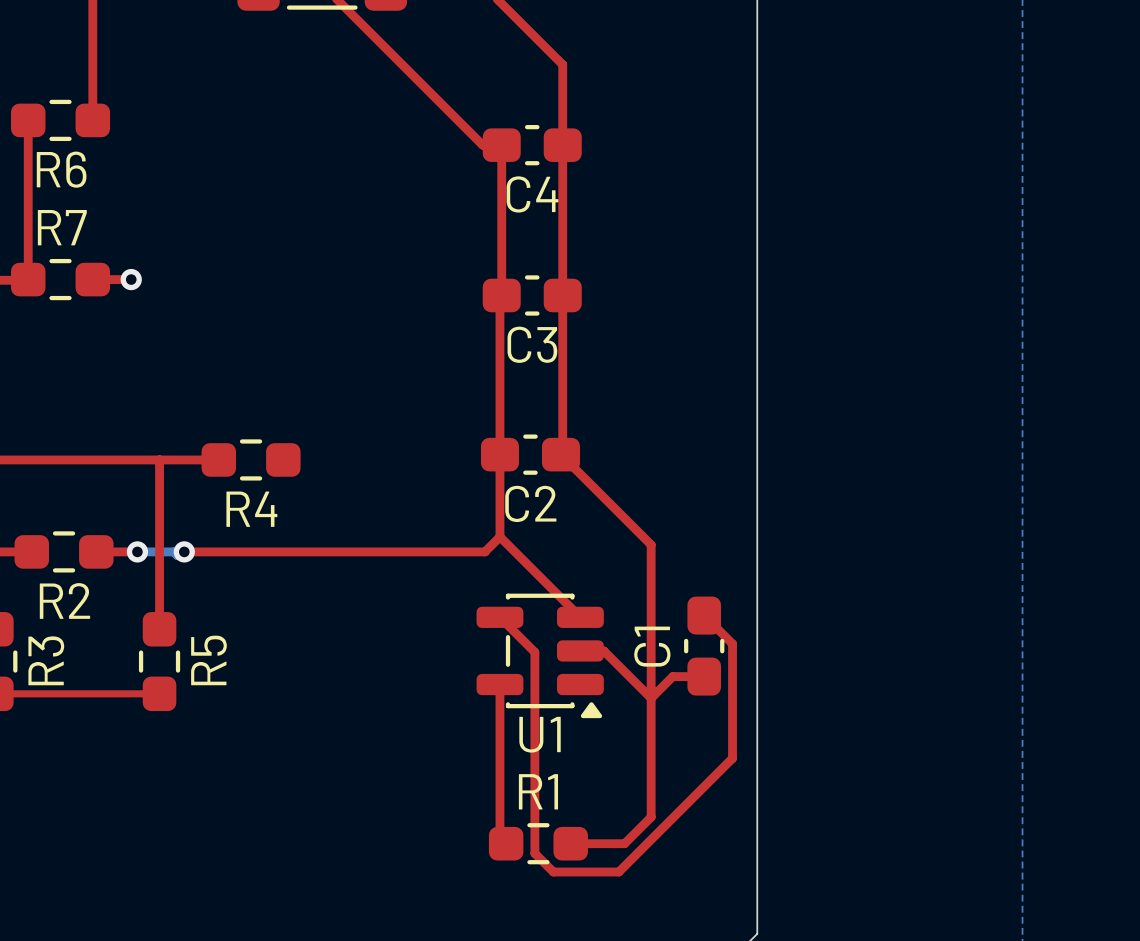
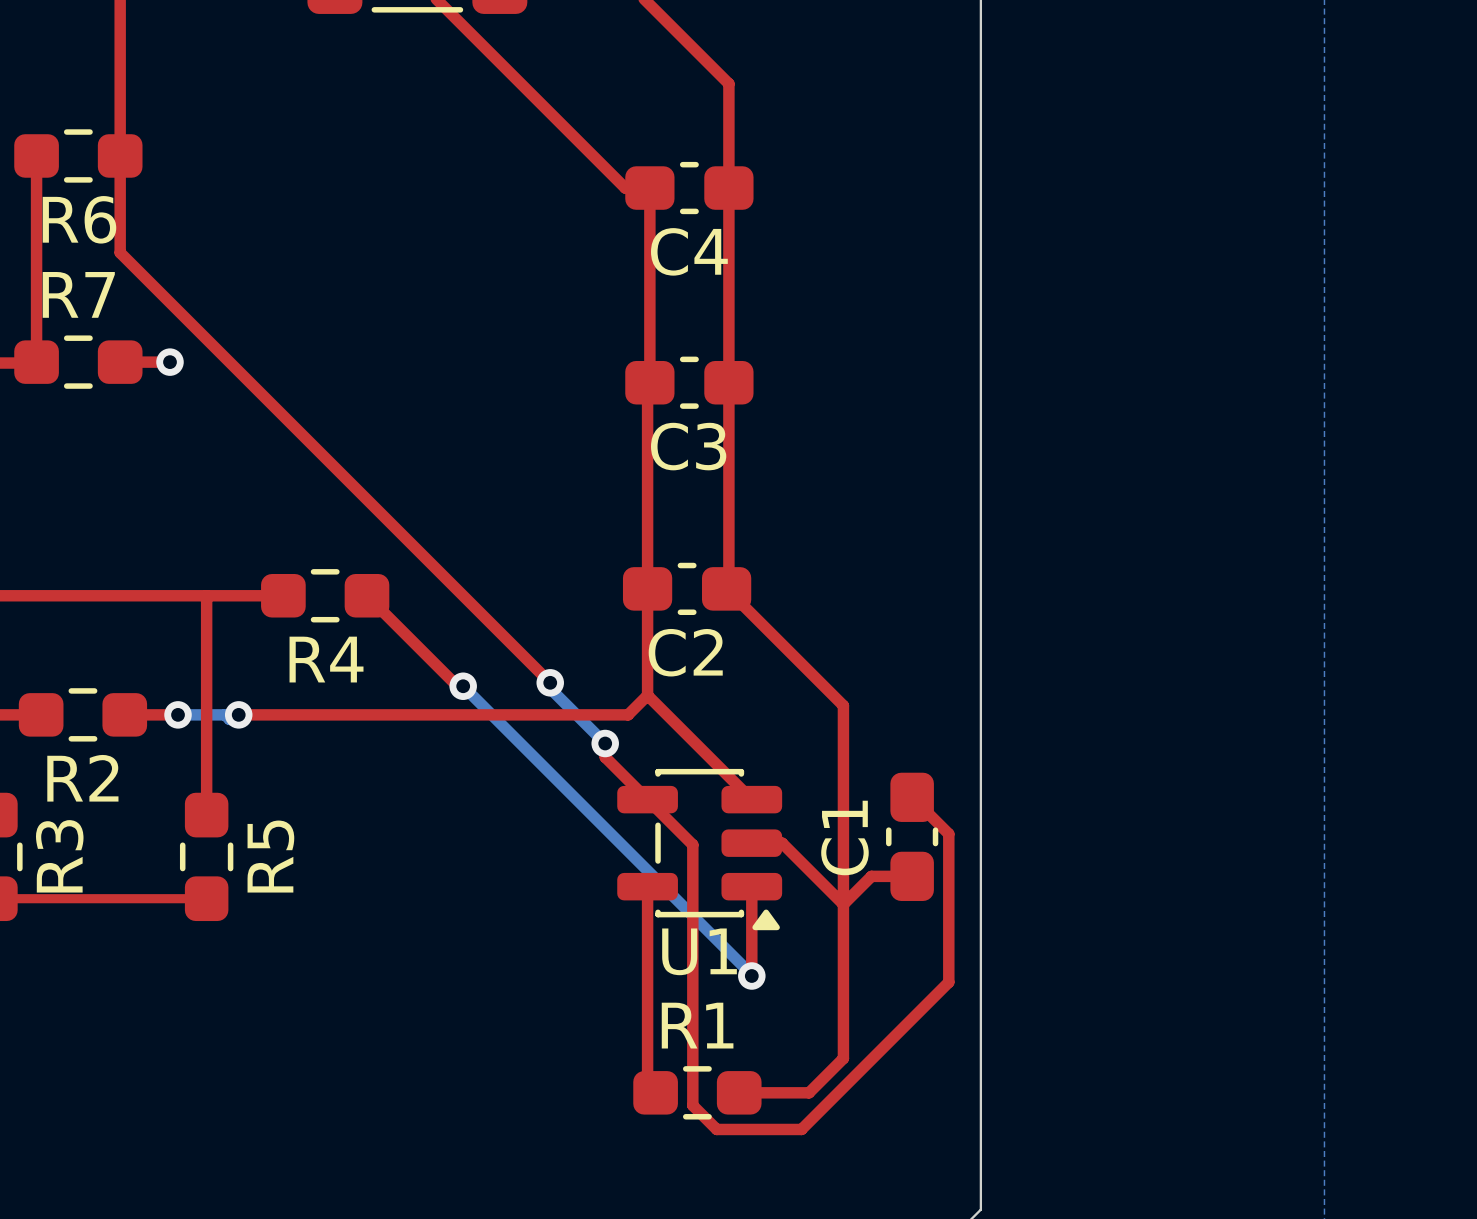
top track: none -> (120, 155) (120, 252) (550, 682)
top track: none -> (366, 595) (457, 686) (463, 686)
bottom track: none -> (550, 682) (550, 688) (605, 743)
via: none -> (550, 682)
bottom track: none -> (463, 686) (751, 976)
via: none -> (463, 686)
top track: none -> (605, 743) (605, 757) (647, 799)
via: none -> (605, 743)
top track: none -> (751, 886) (751, 976)
via: none -> (751, 976)

